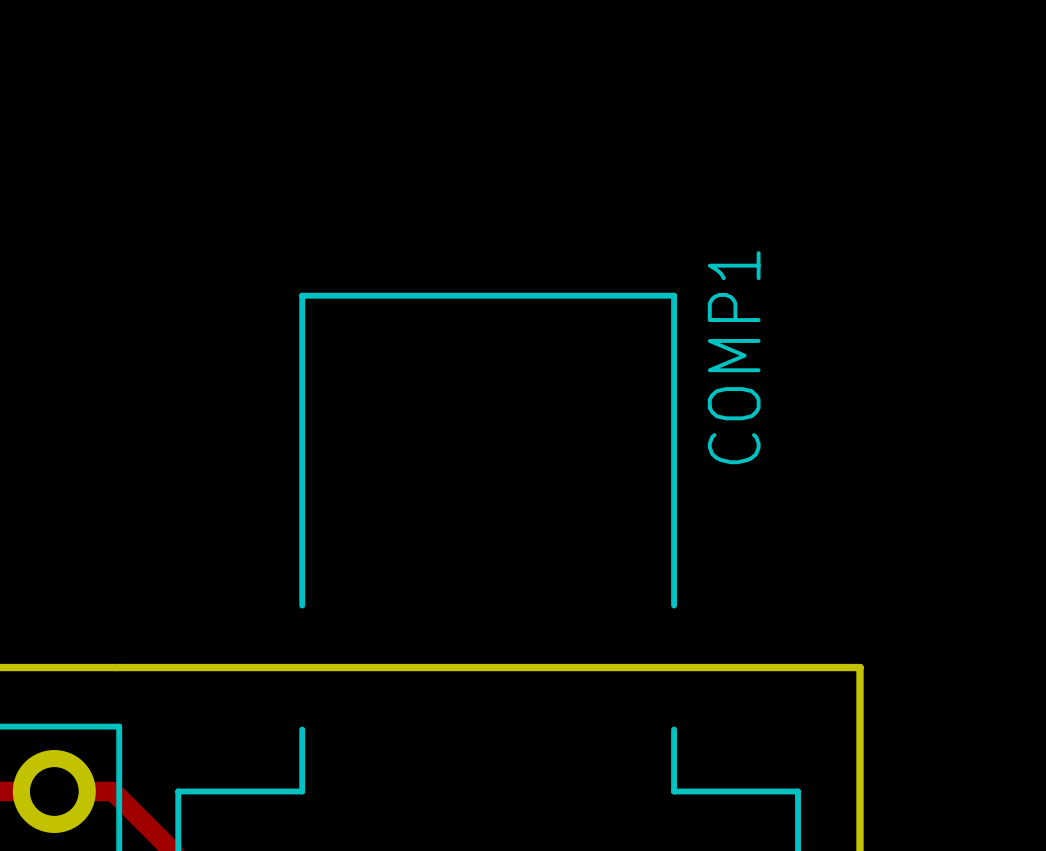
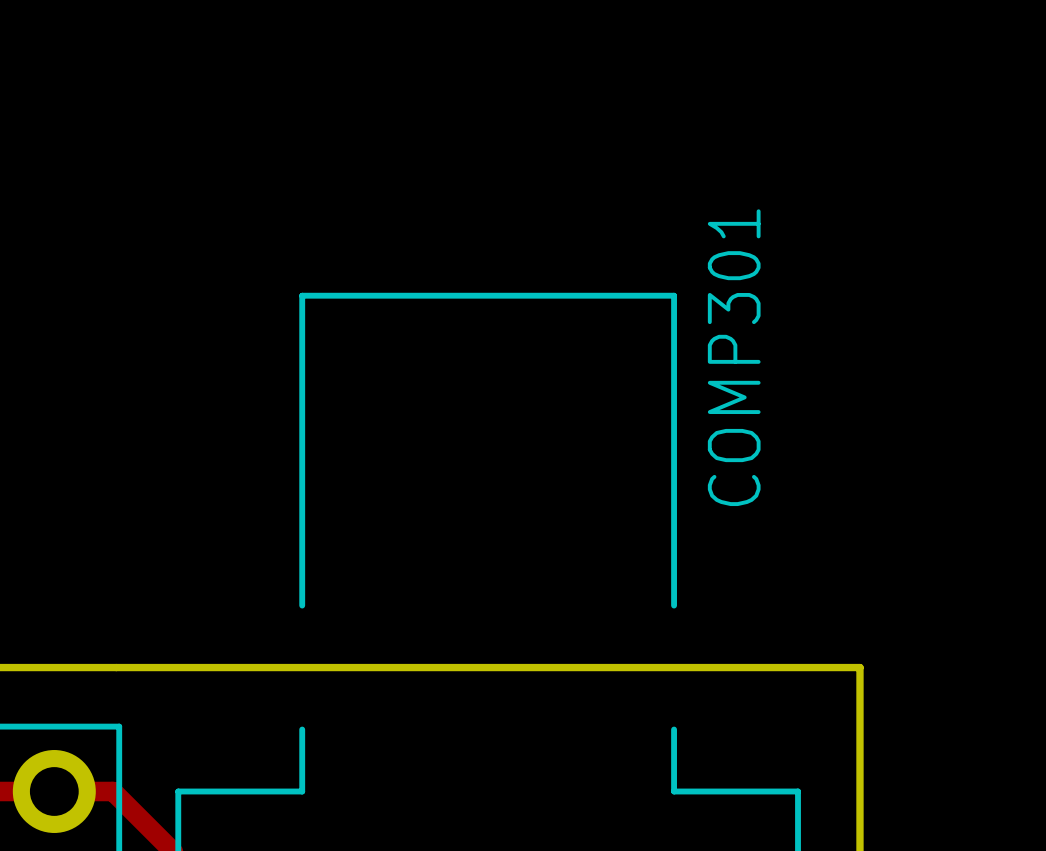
COMP1 name: COMP1 (734, 357) -> COMP301 (734, 357)

